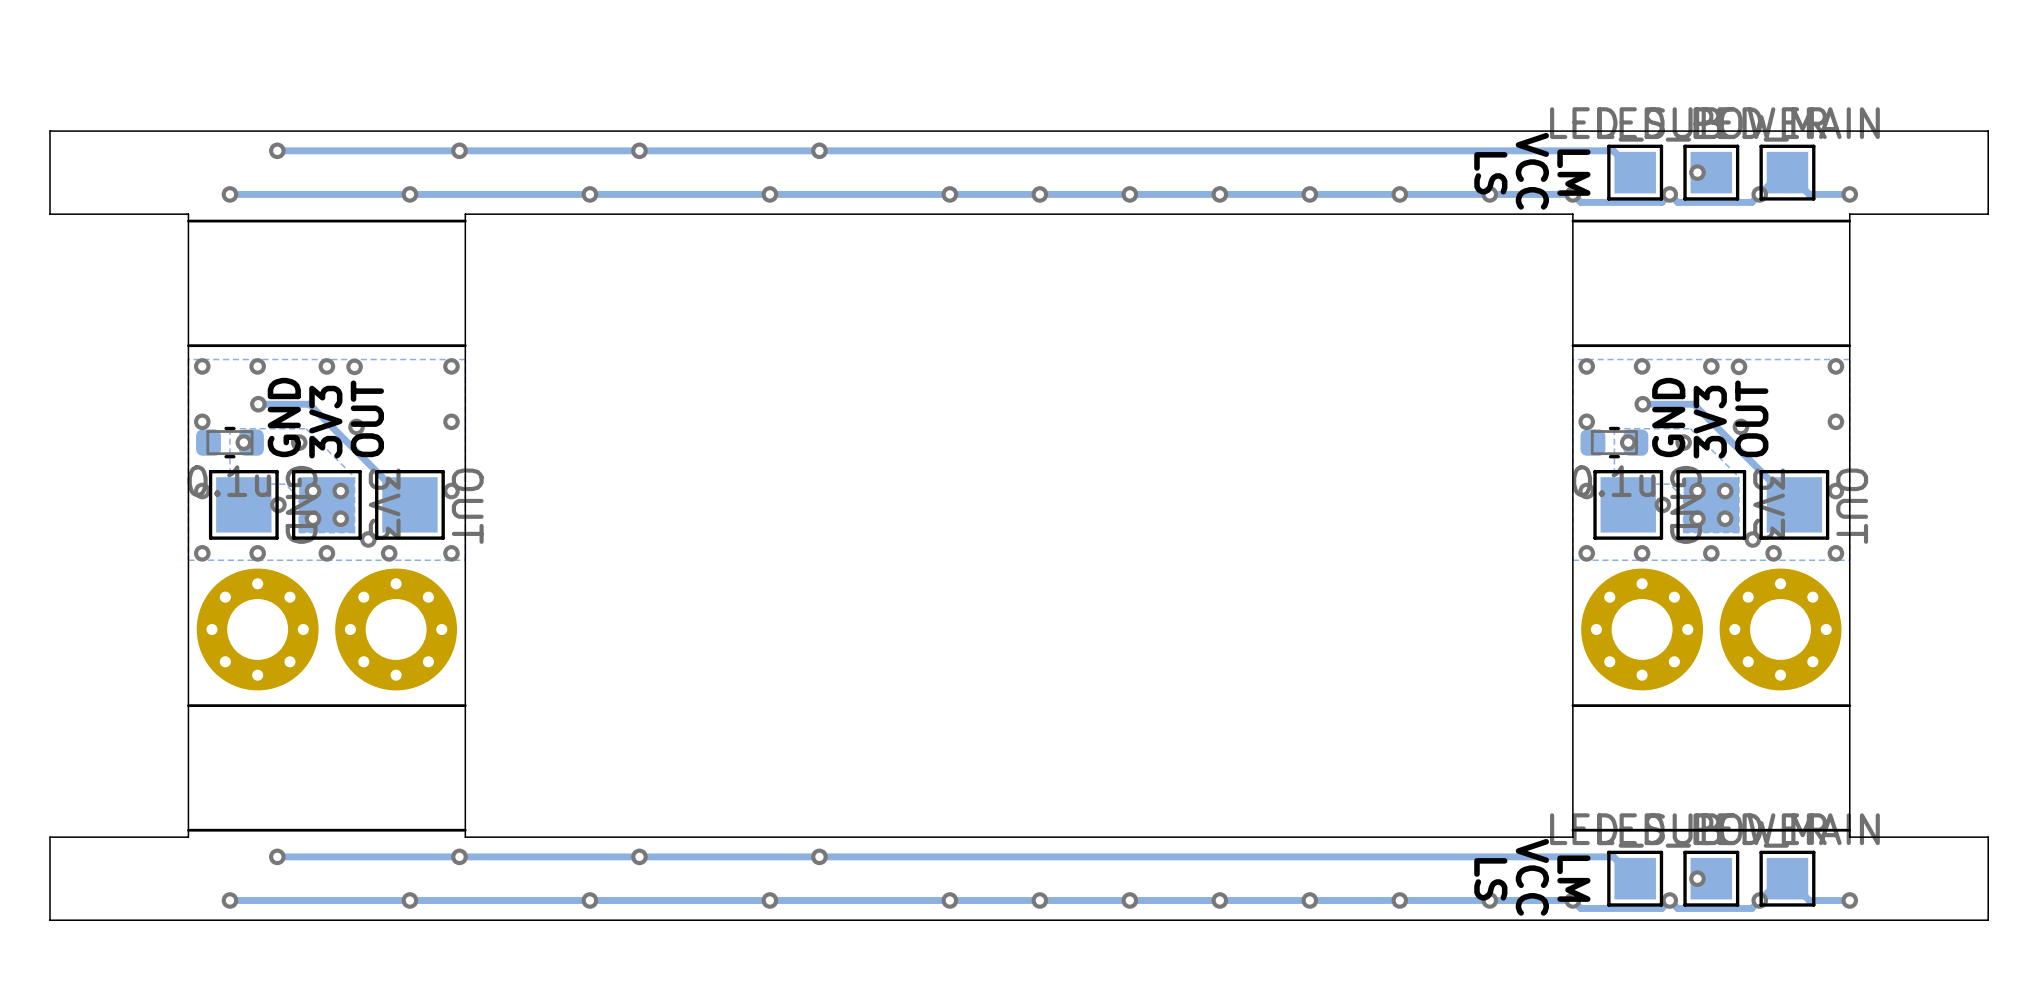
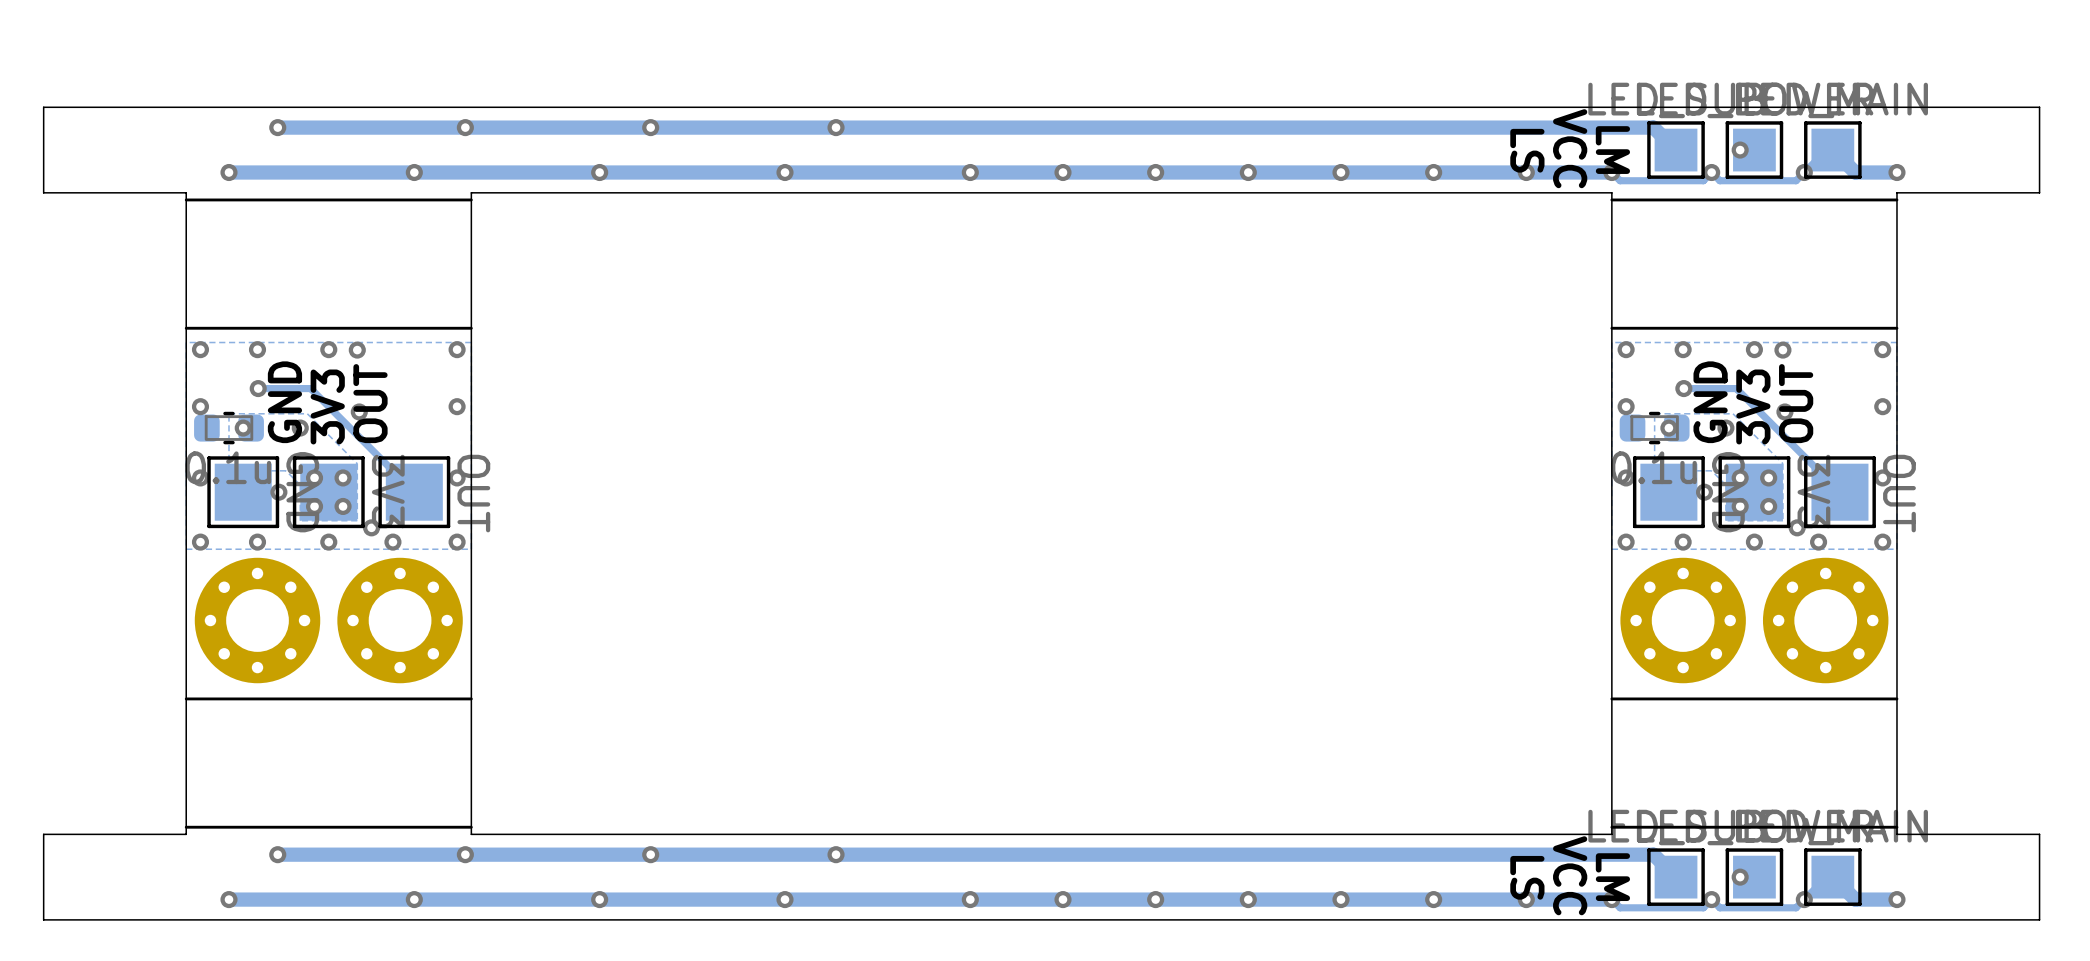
track width: thin (277, 150) (1613, 150) (1635, 172) -> thick (277, 127) (1653, 127) (1676, 150)
track width: thin (1787, 172) (1809, 194) (1849, 194) -> thick (1832, 150) (1855, 172) (1896, 172)
track width: thin (1572, 194) (229, 194) -> thick (1611, 172) (228, 172)
track width: thin (277, 856) (1613, 856) (1635, 878) -> thick (277, 854) (1653, 854) (1676, 877)
track width: thin (1787, 878) (1809, 900) (1849, 900) -> thick (1832, 877) (1855, 899) (1896, 899)
track width: thin (1572, 900) (229, 900) -> thick (1611, 899) (228, 899)

